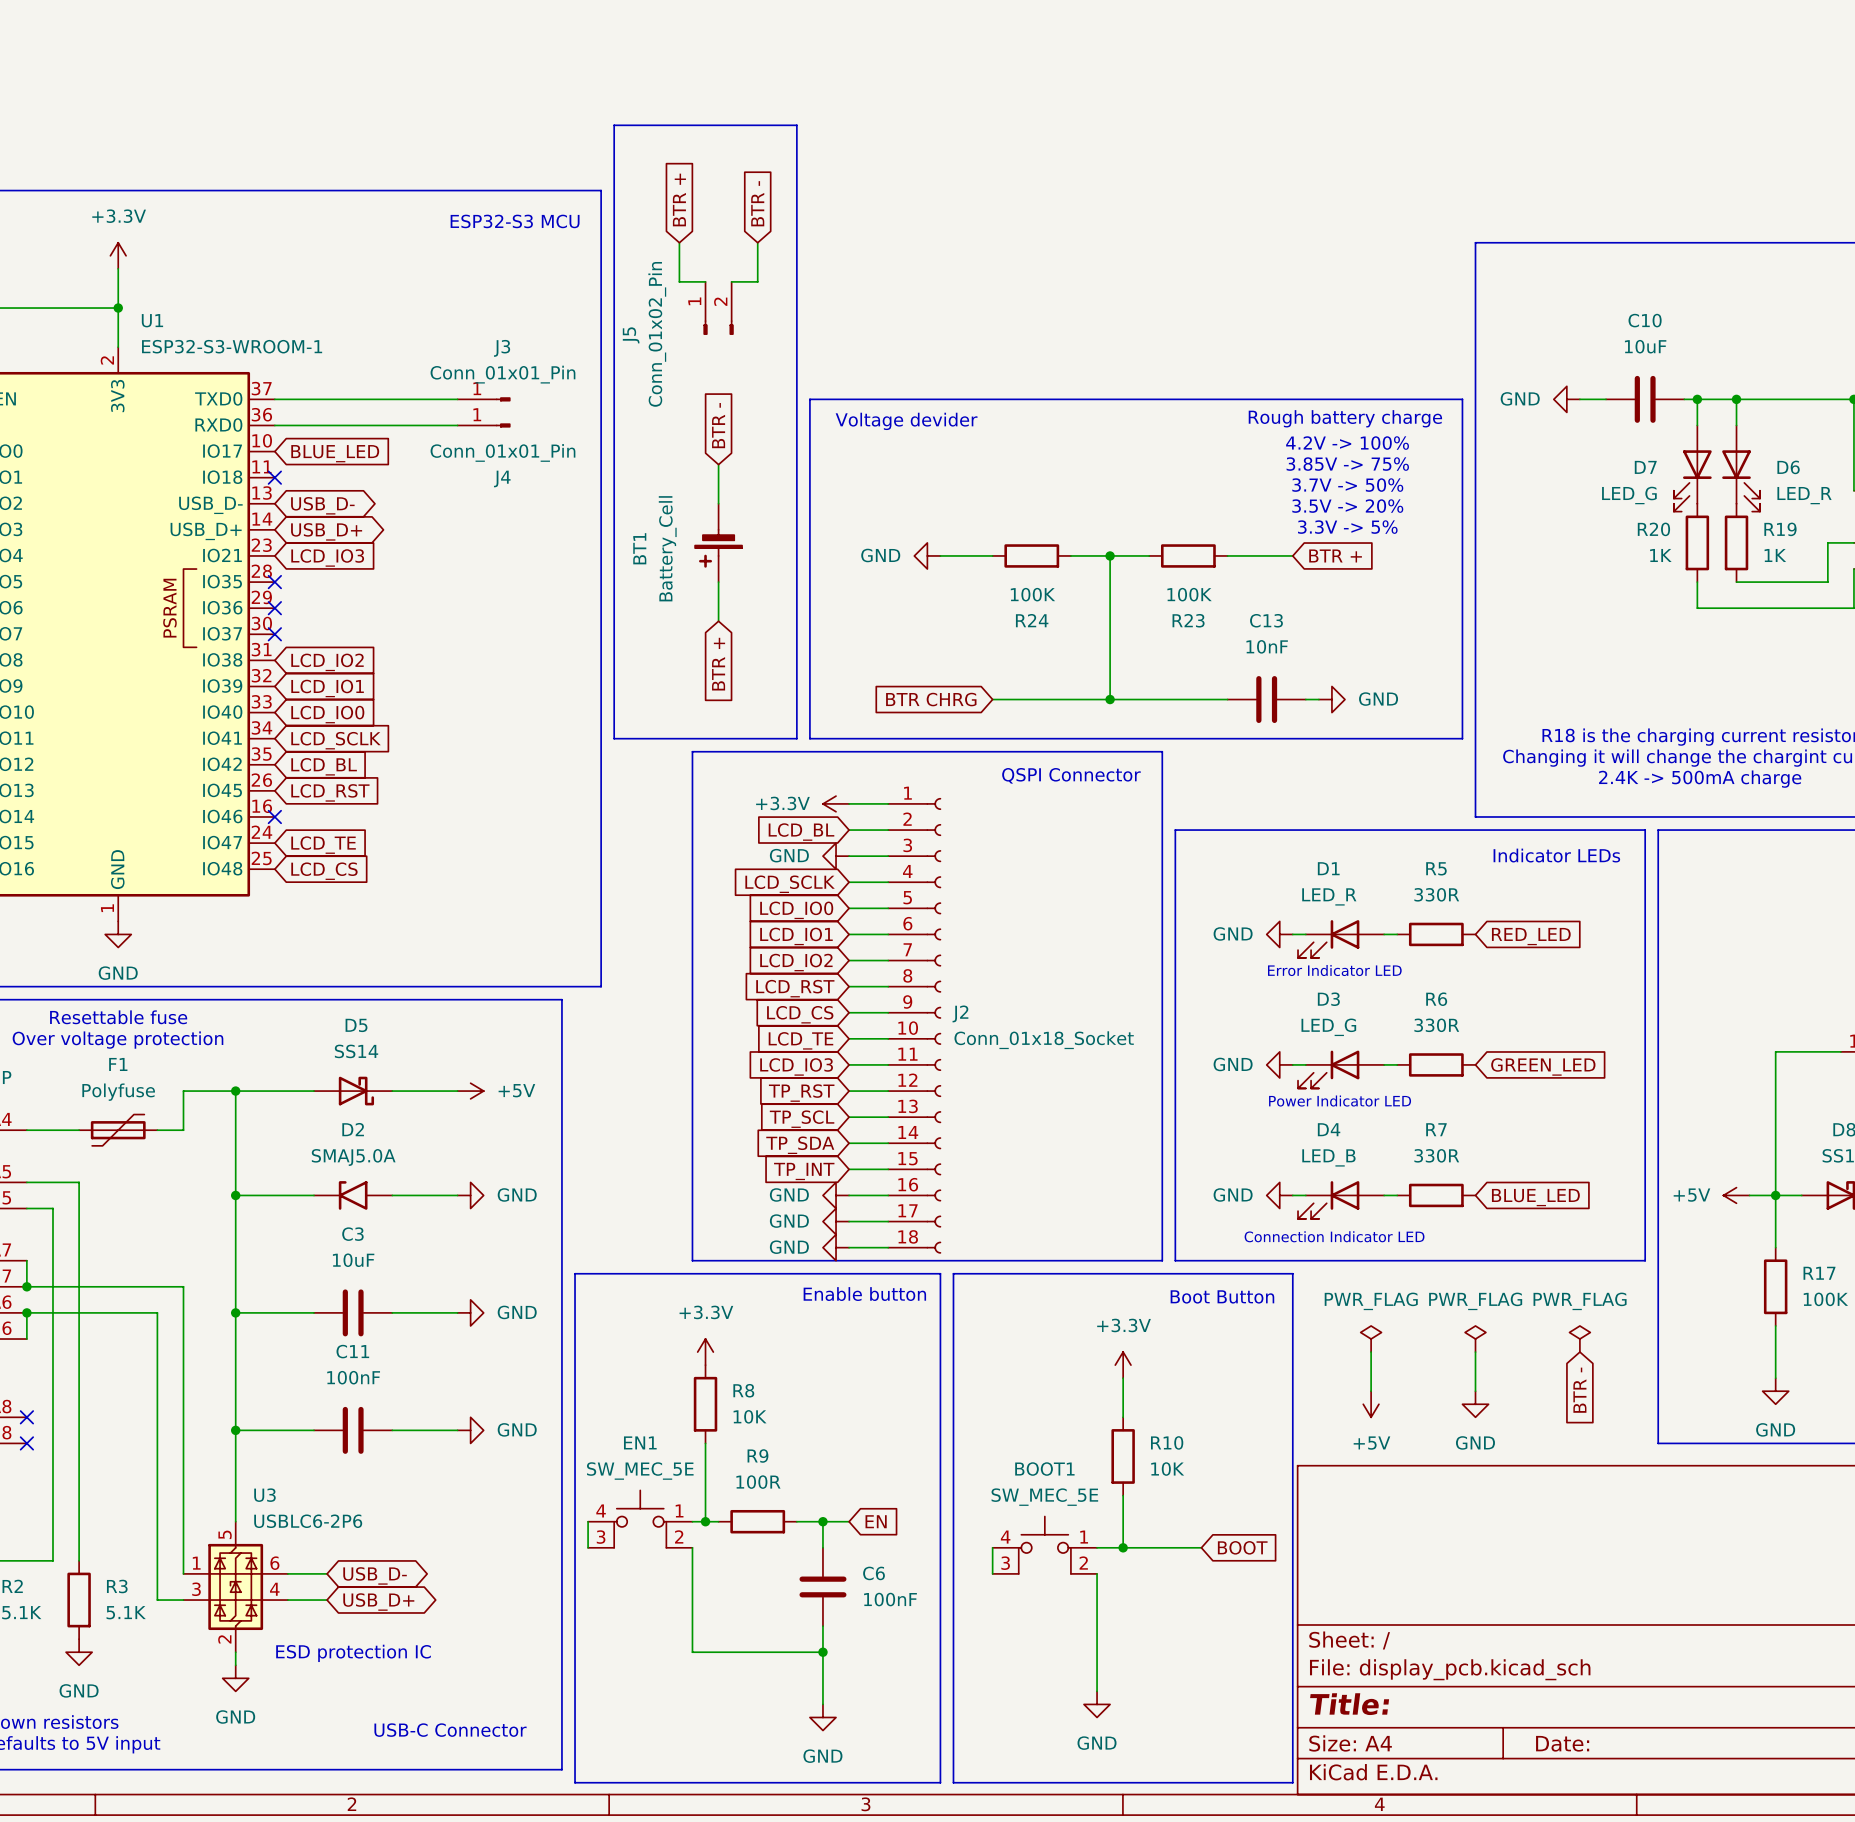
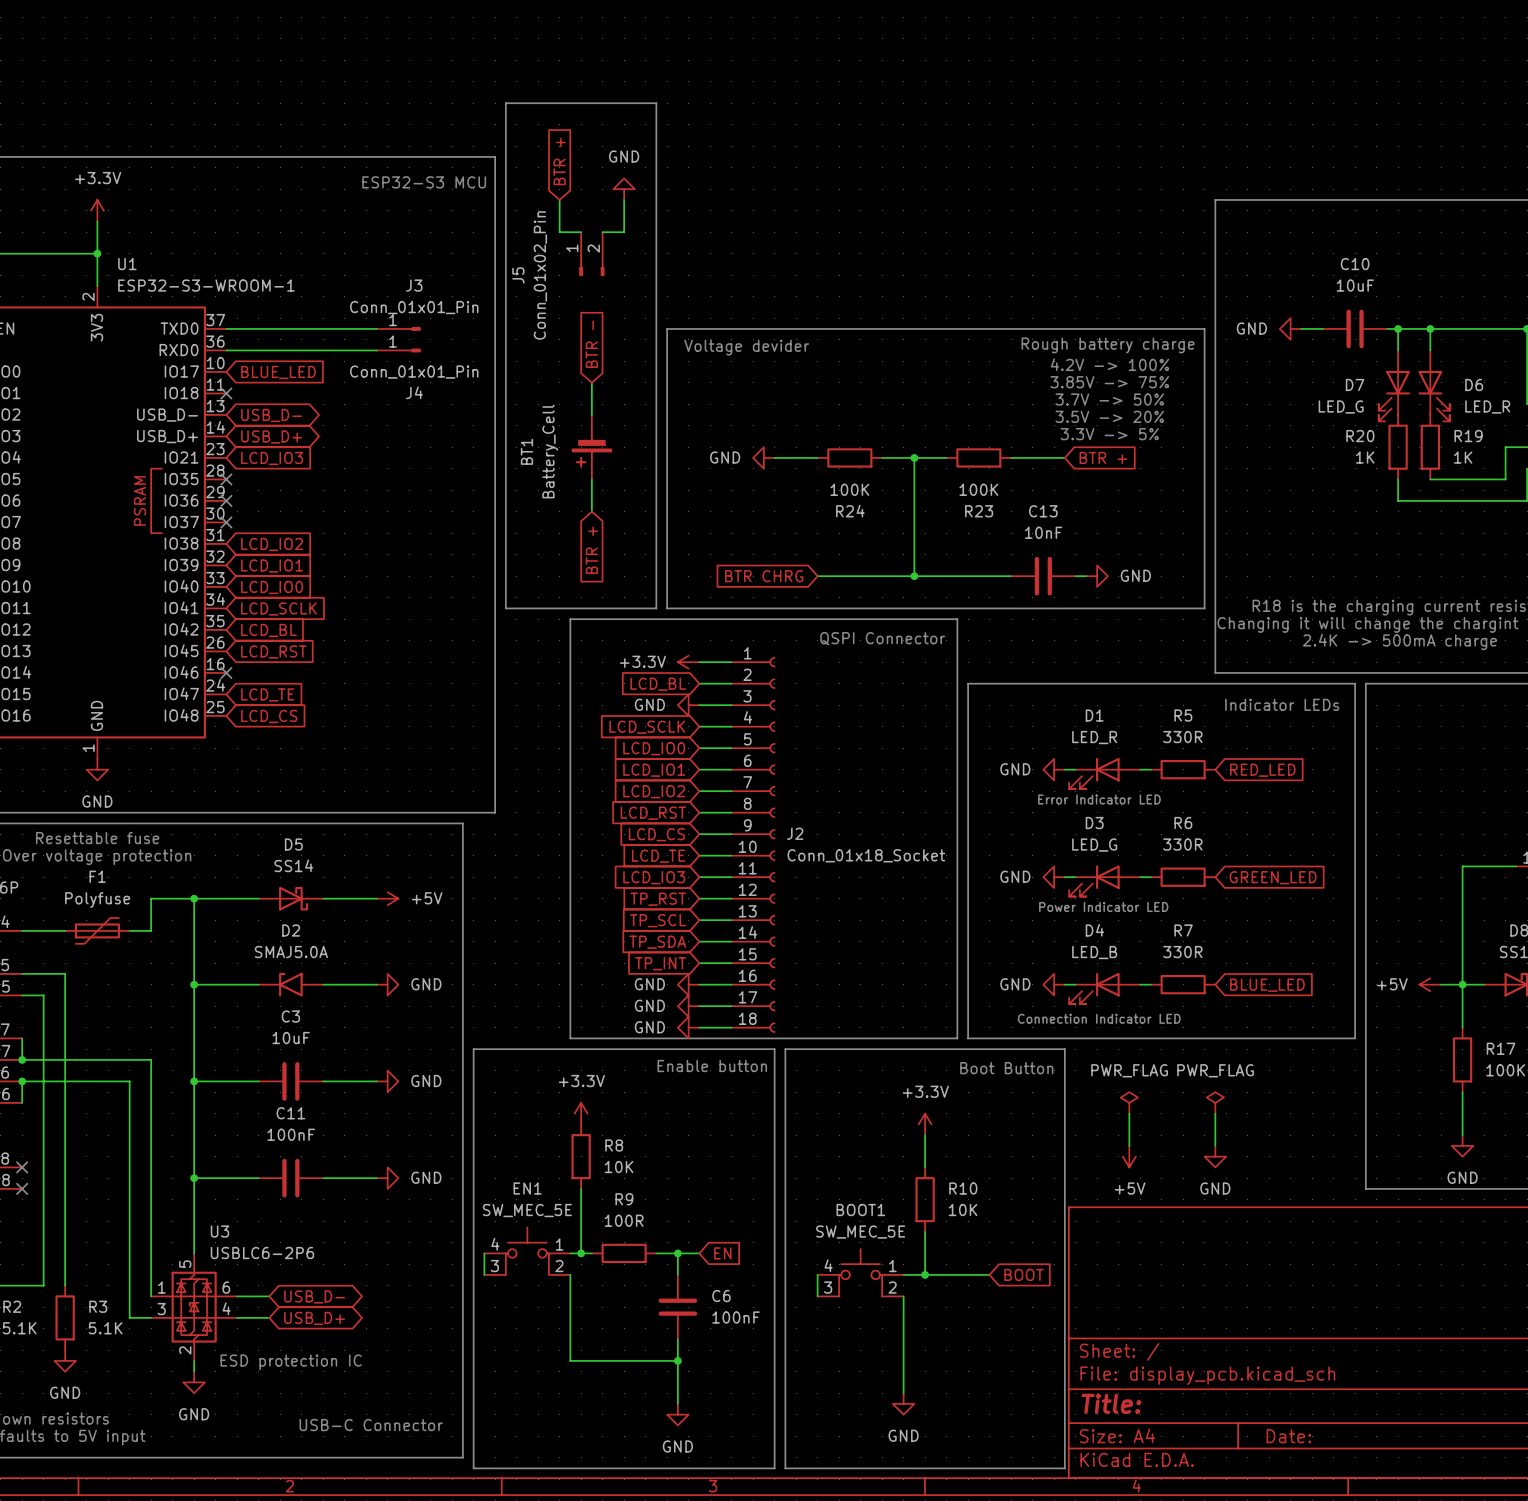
global label: BTR - (757, 203) -> none
power symbol: none -> GND (624, 189)
power symbol: PWR_FLAG (1579, 1339) -> none
global label: BTR - (1579, 1390) -> none

